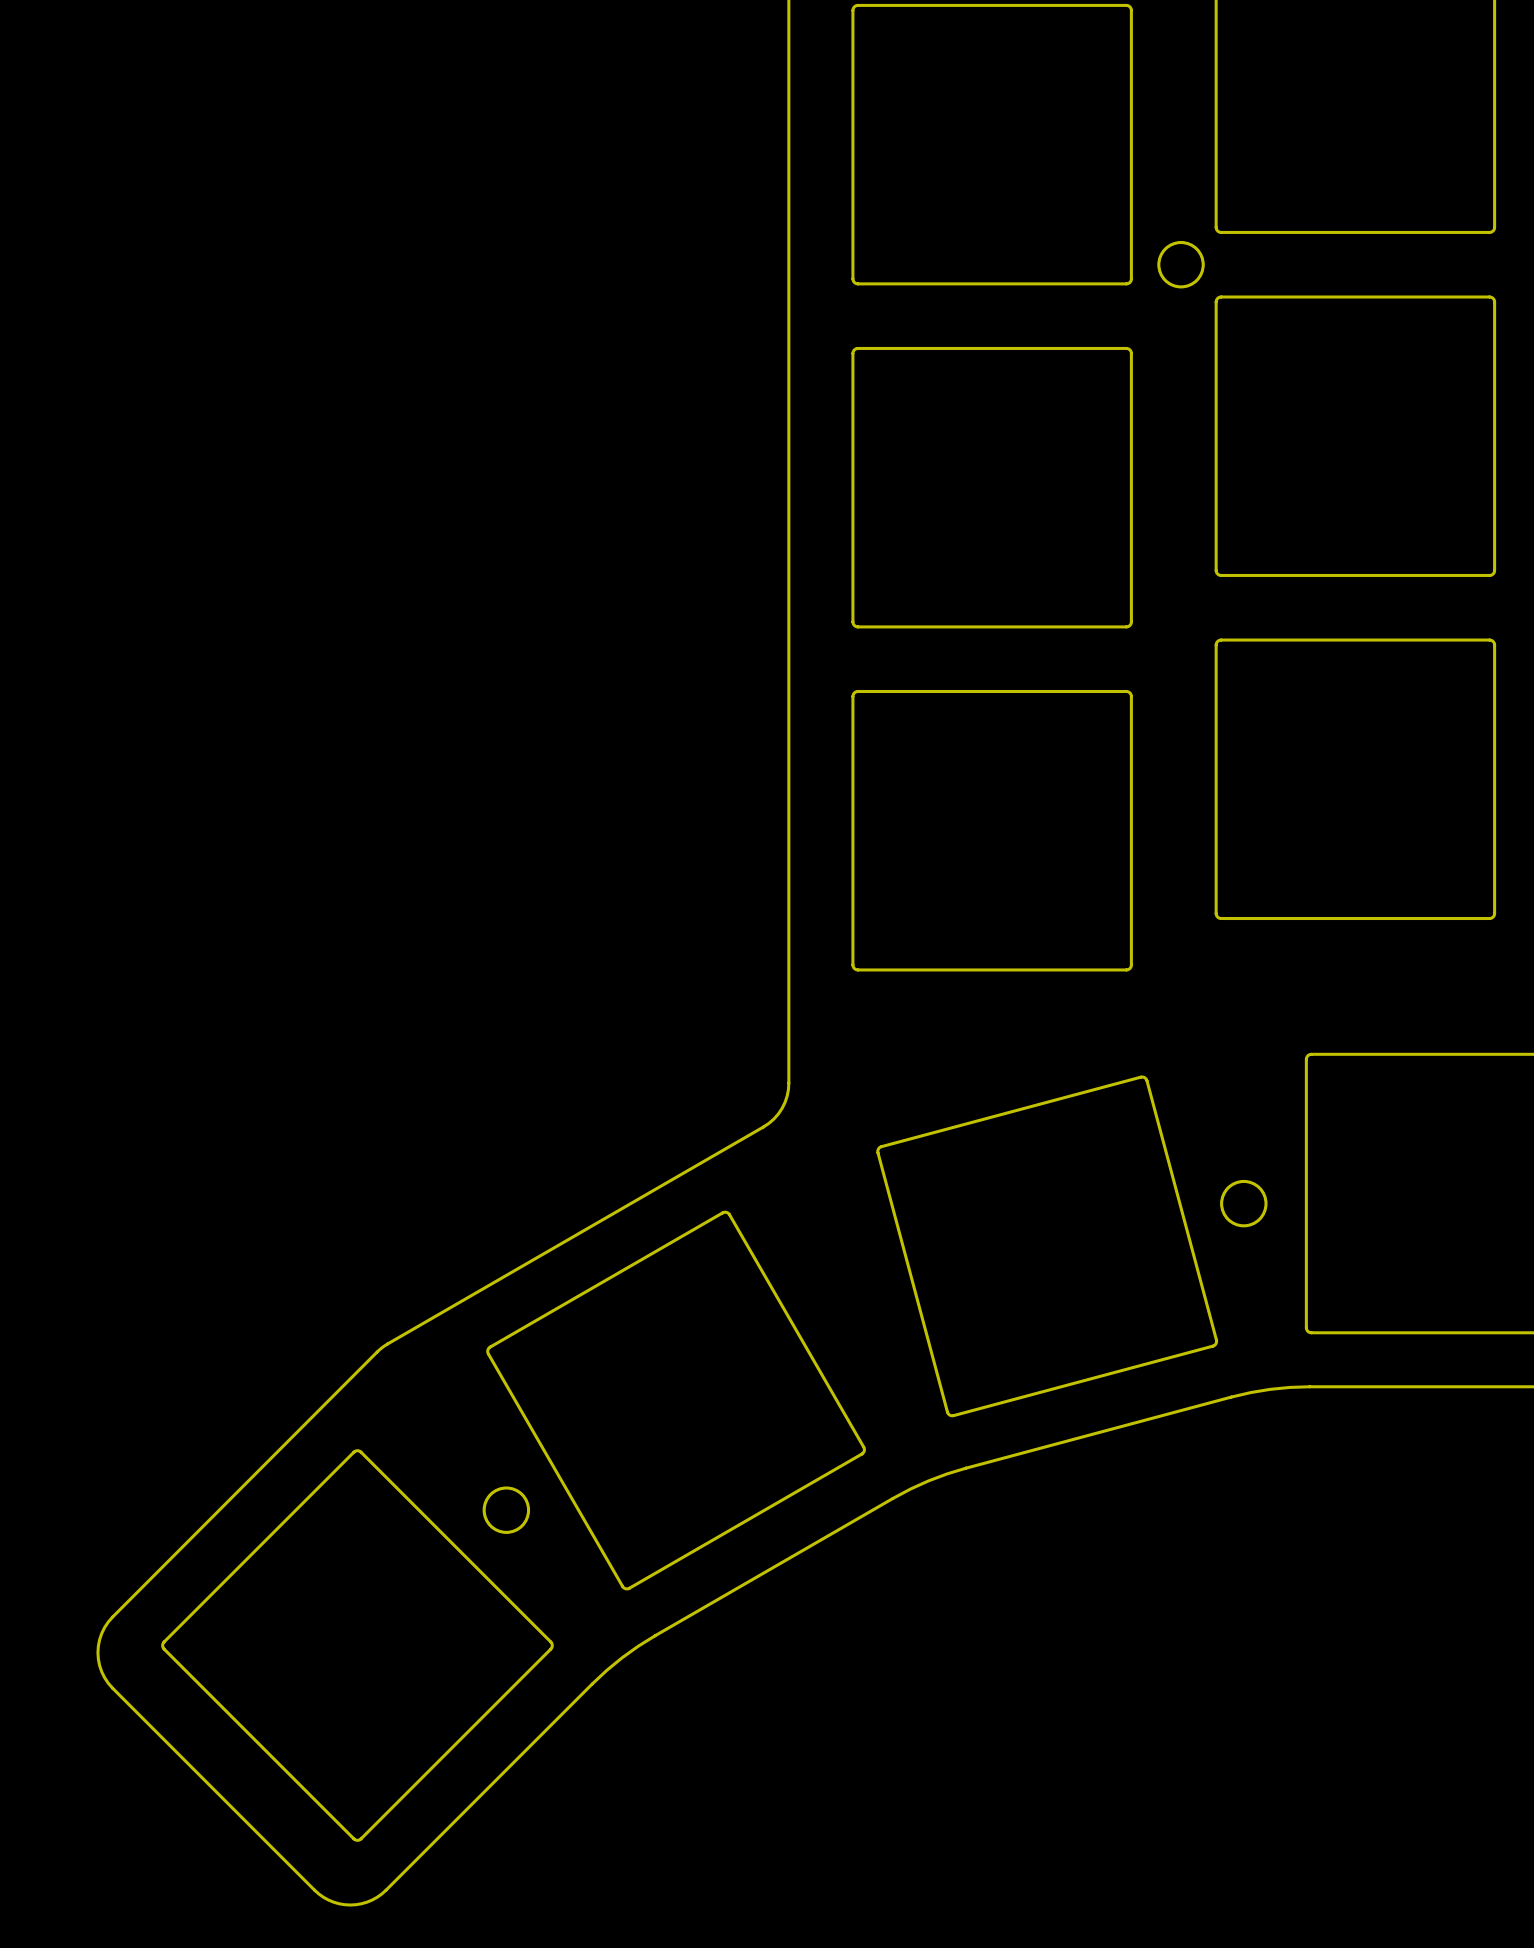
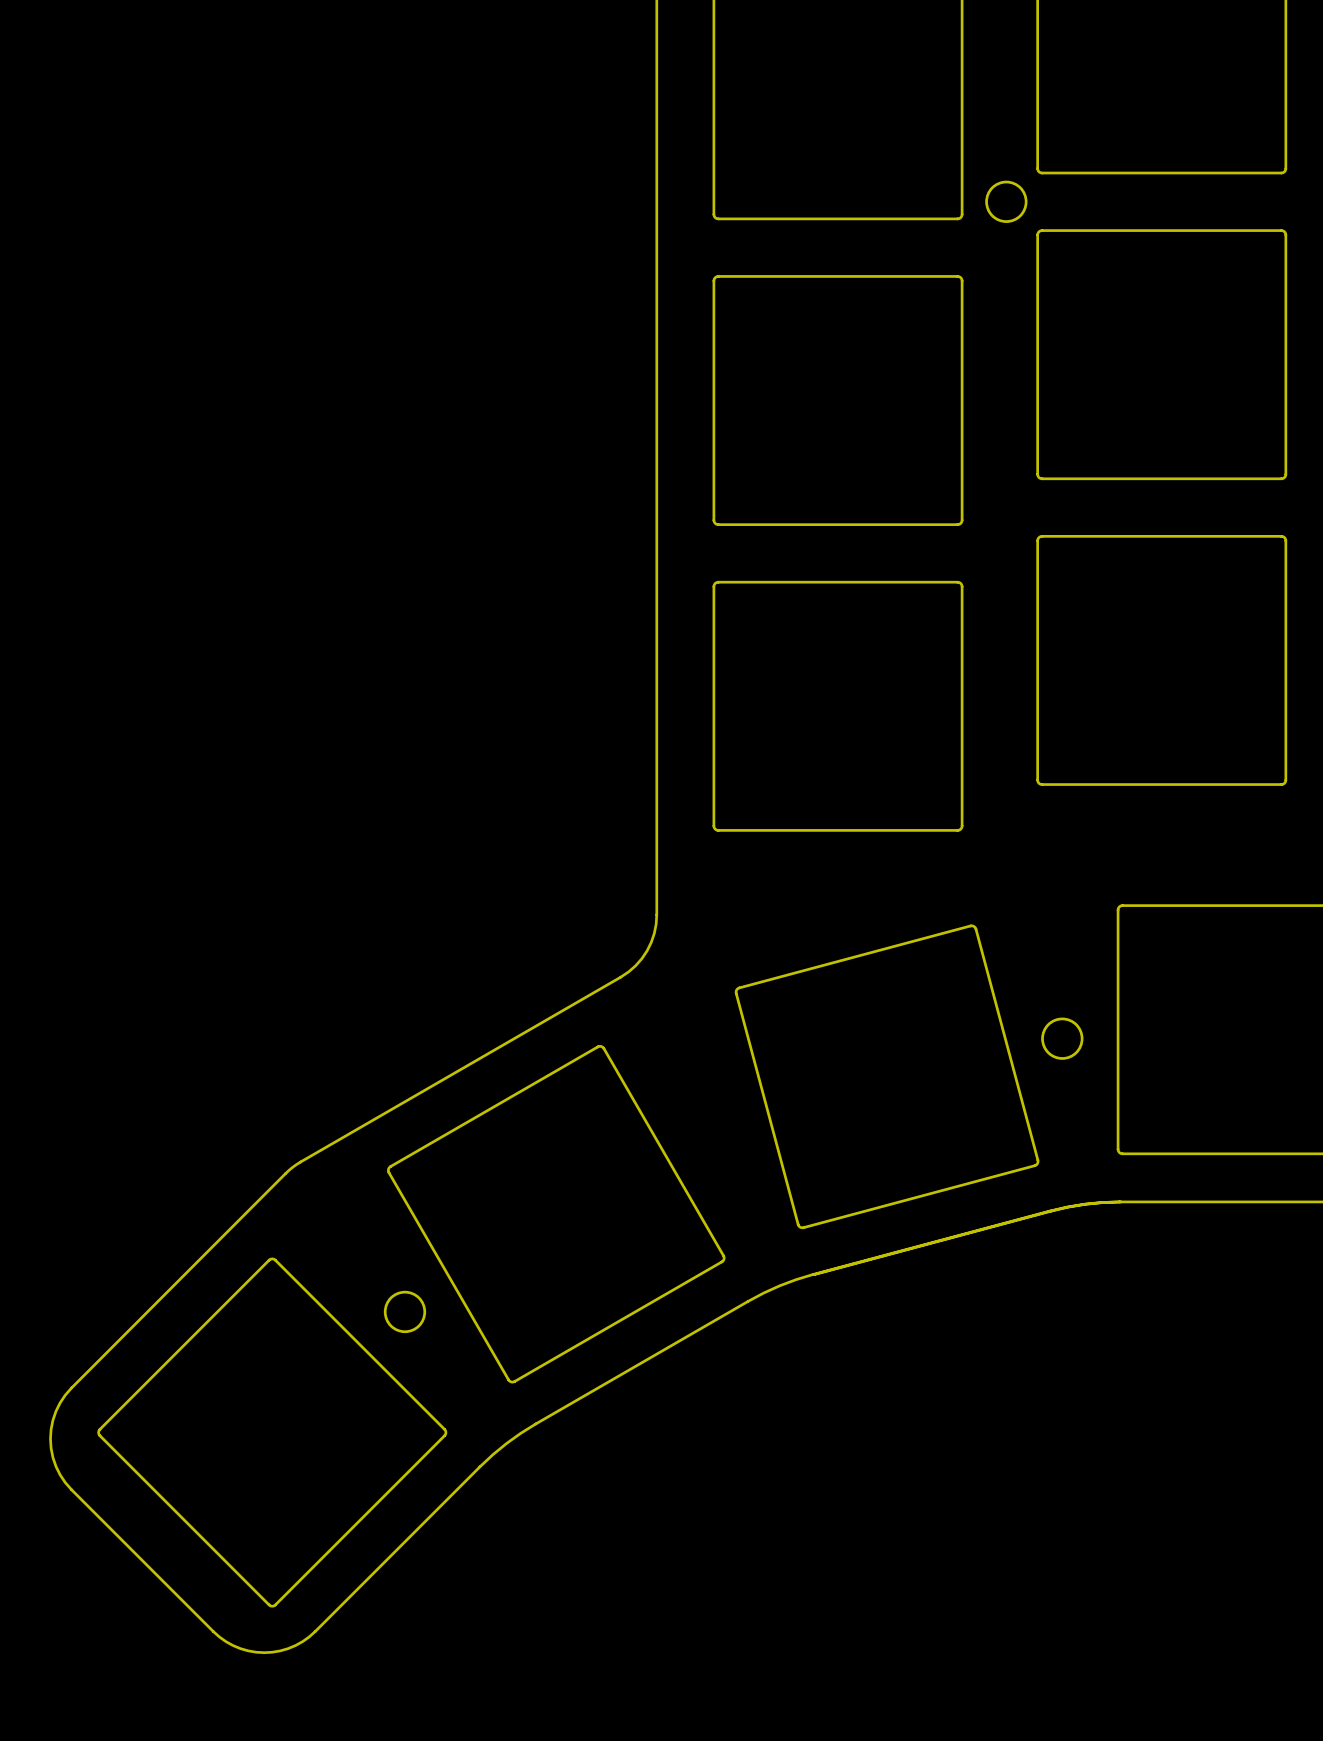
board edge: (788, 1064) (787, 1096) (782, 1108) (769, 1123) (379, 1349) (108, 1621) (101, 1633) (98, 1646) (98, 1659) (101, 1671) (112, 1688) (318, 1894) (339, 1903) (361, 1903) (372, 1900) (386, 1890) (592, 1683) (622, 1657) (655, 1635) (892, 1498) (928, 1480) (965, 1468) -> (656, 914) (654, 933) (647, 950) (628, 971) (292, 1167) (71, 1388) (60, 1402) (52, 1420) (51, 1448) (55, 1466) (65, 1482) (213, 1631) (226, 1641) (240, 1648) (264, 1652) (280, 1650) (302, 1641) (315, 1631) (479, 1466) (506, 1443) (535, 1423) (763, 1293) (813, 1274) (1049, 1211) (1084, 1204) (1121, 1201)

